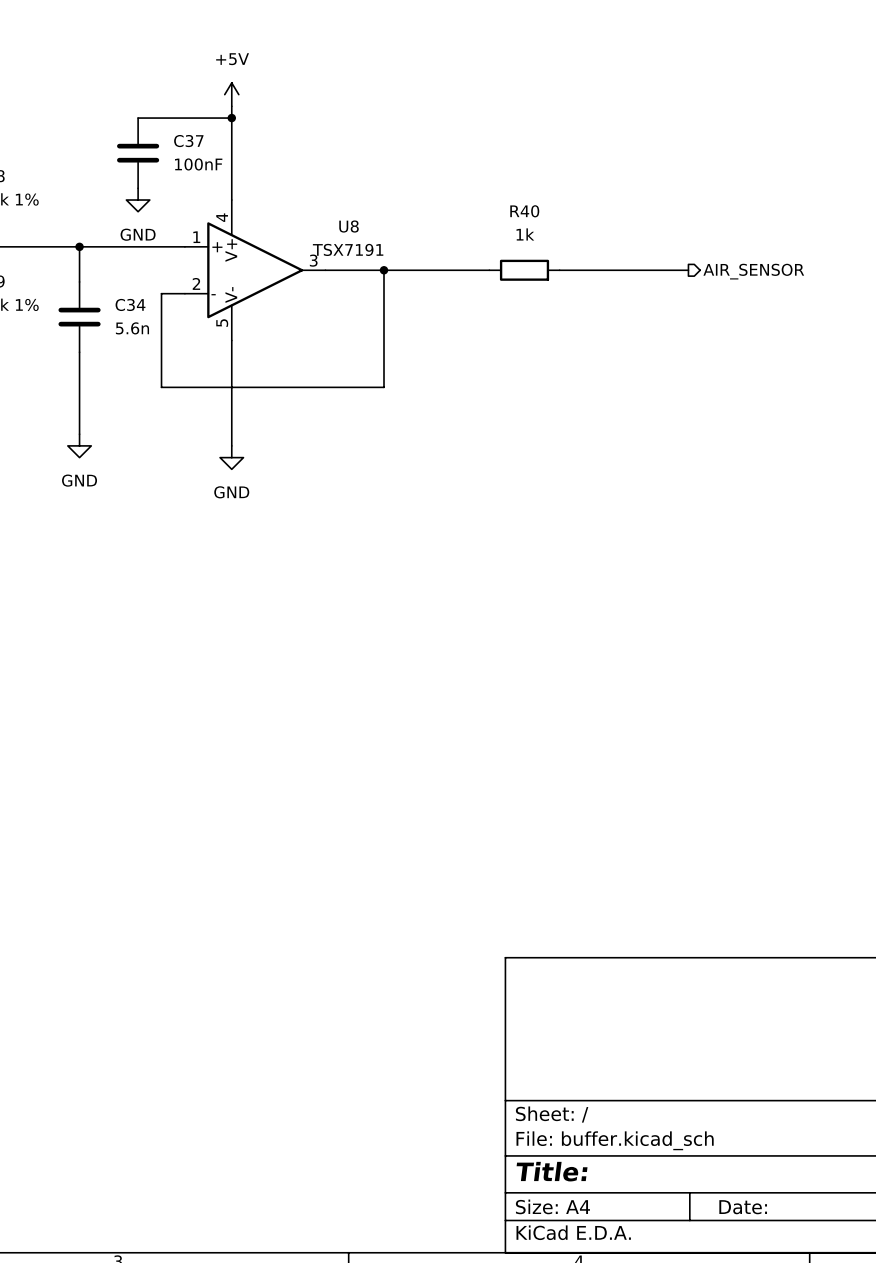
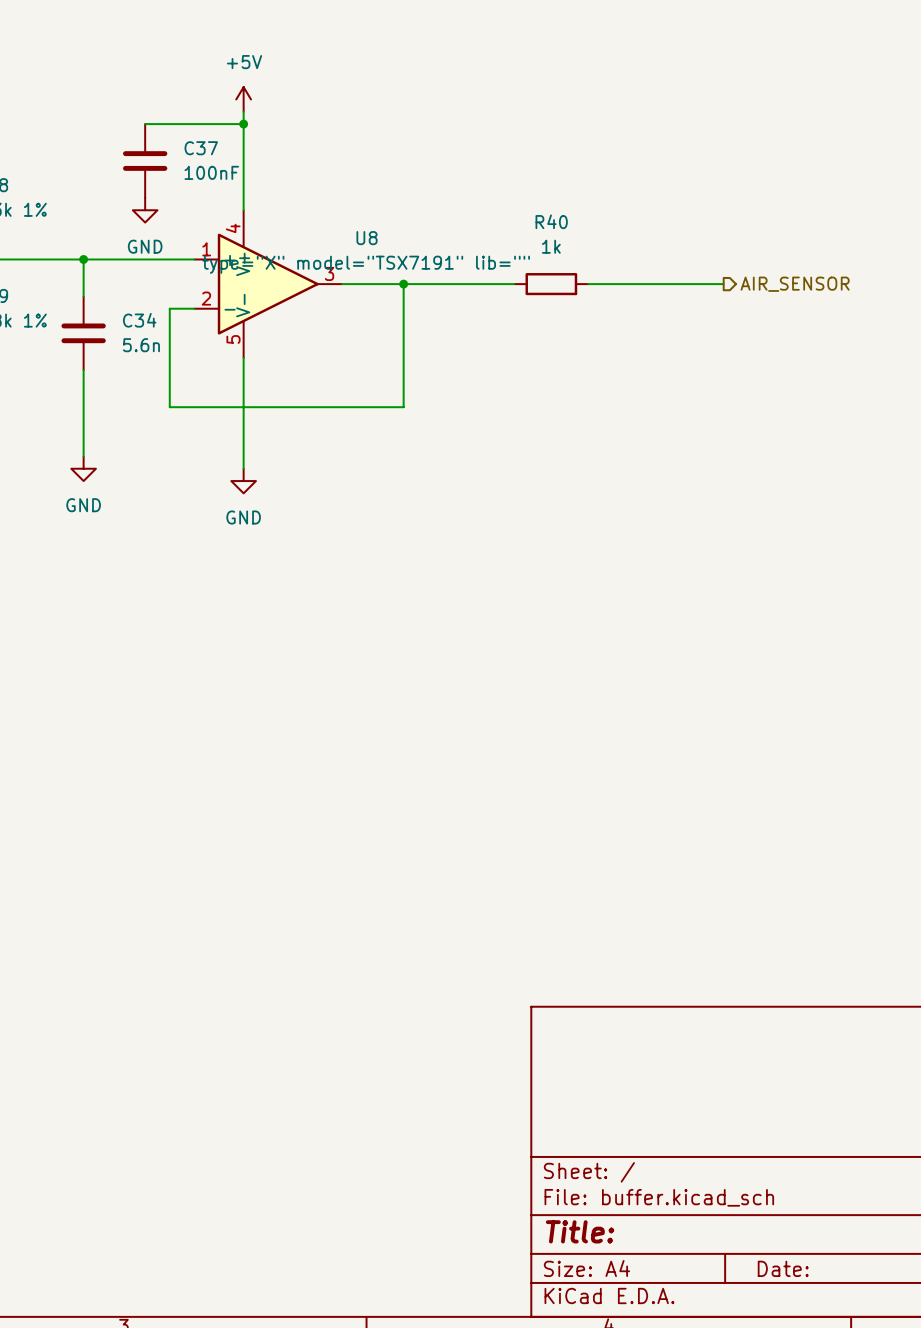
U8 value: TSX7191 (348, 249) -> type="X" model="TSX7191" lib="" (366, 264)

